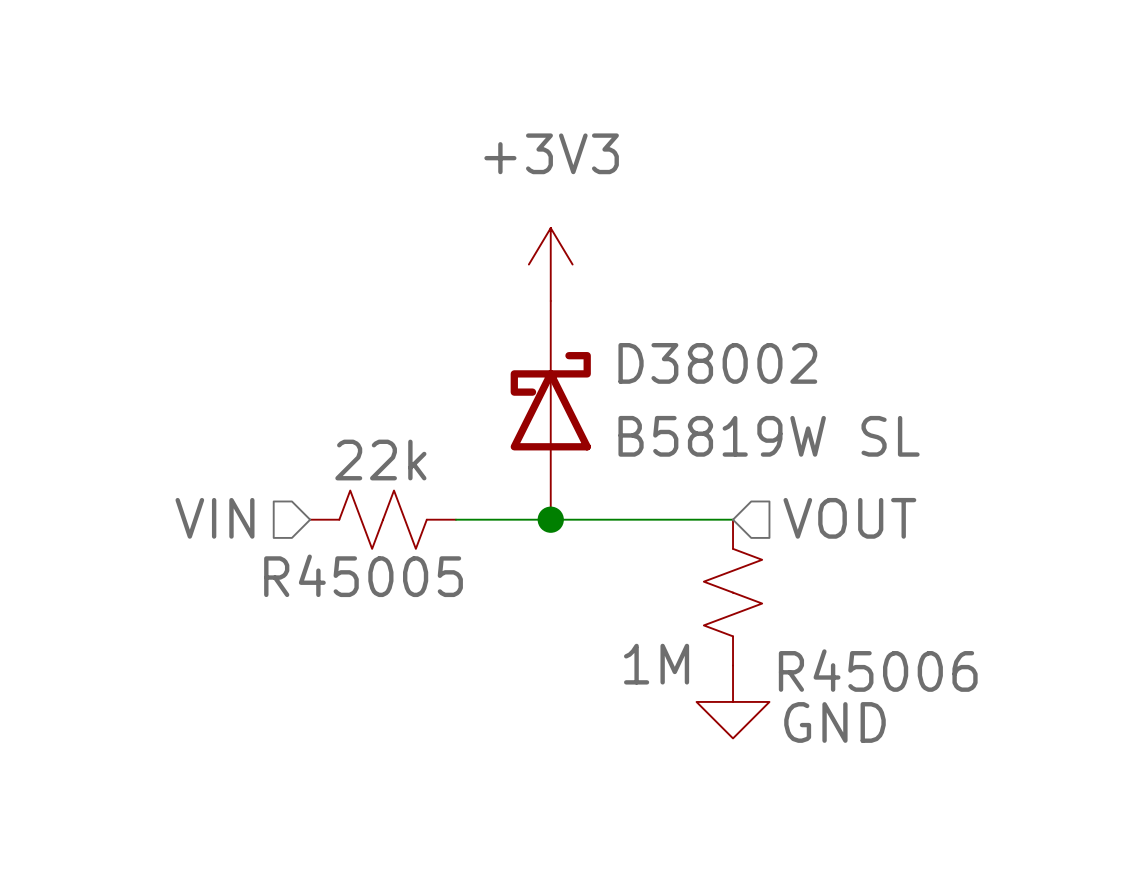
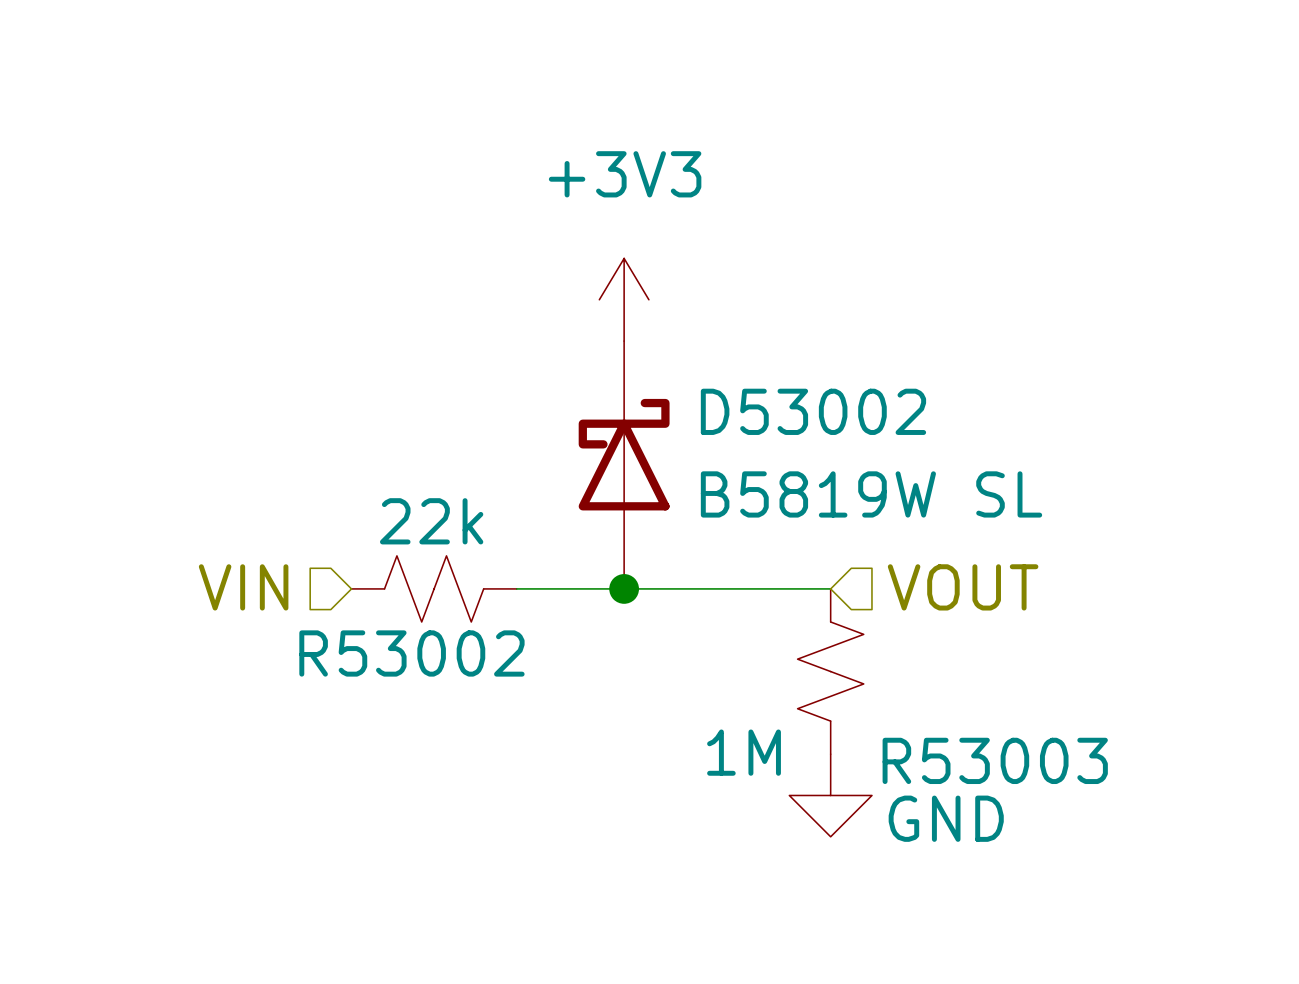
D38002 name: D38002 (717, 363) -> D53002 (813, 411)
R45005 name: R45005 (363, 575) -> R53002 (411, 653)
R45006 name: R45006 (878, 670) -> R53003 (995, 760)

